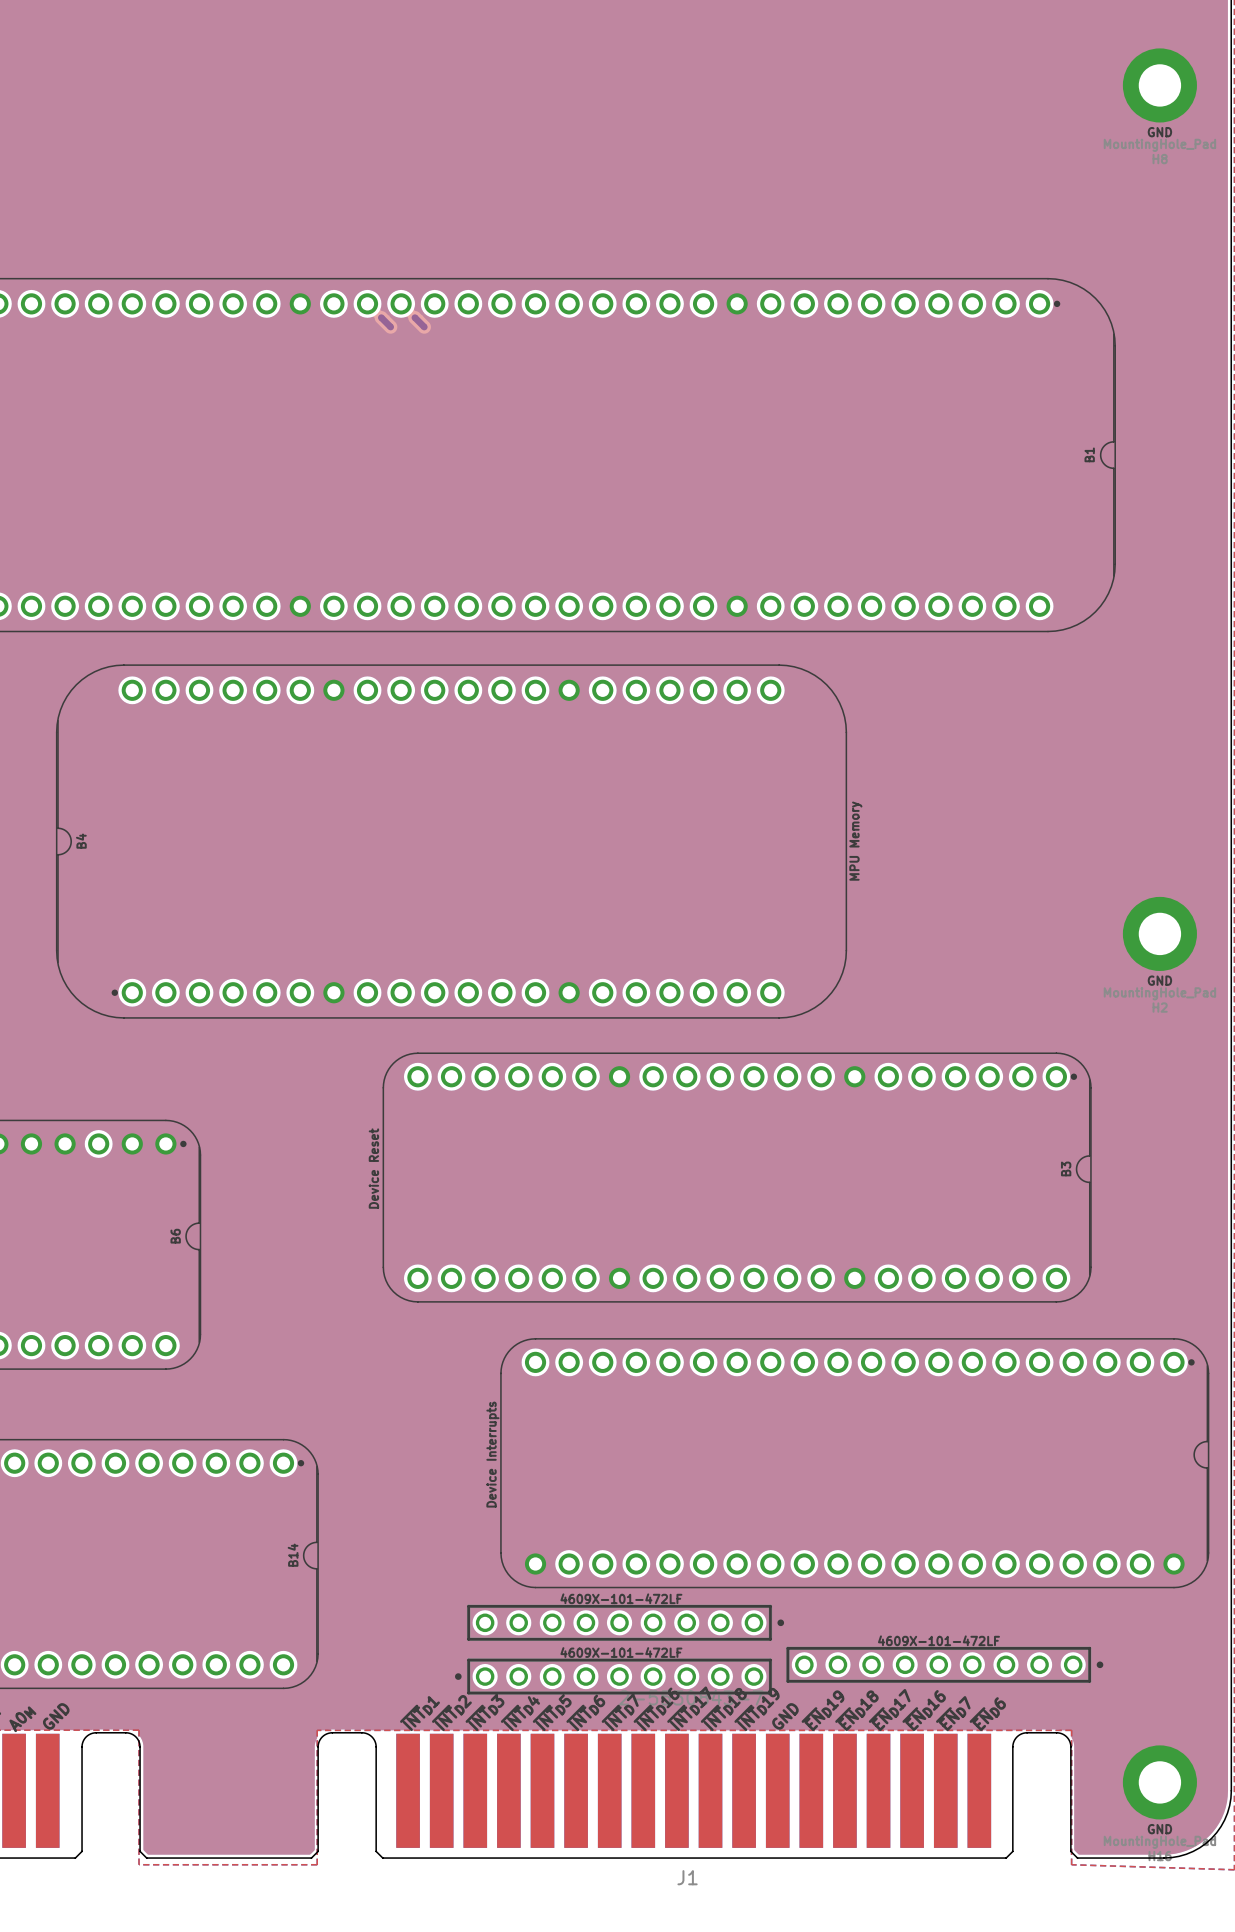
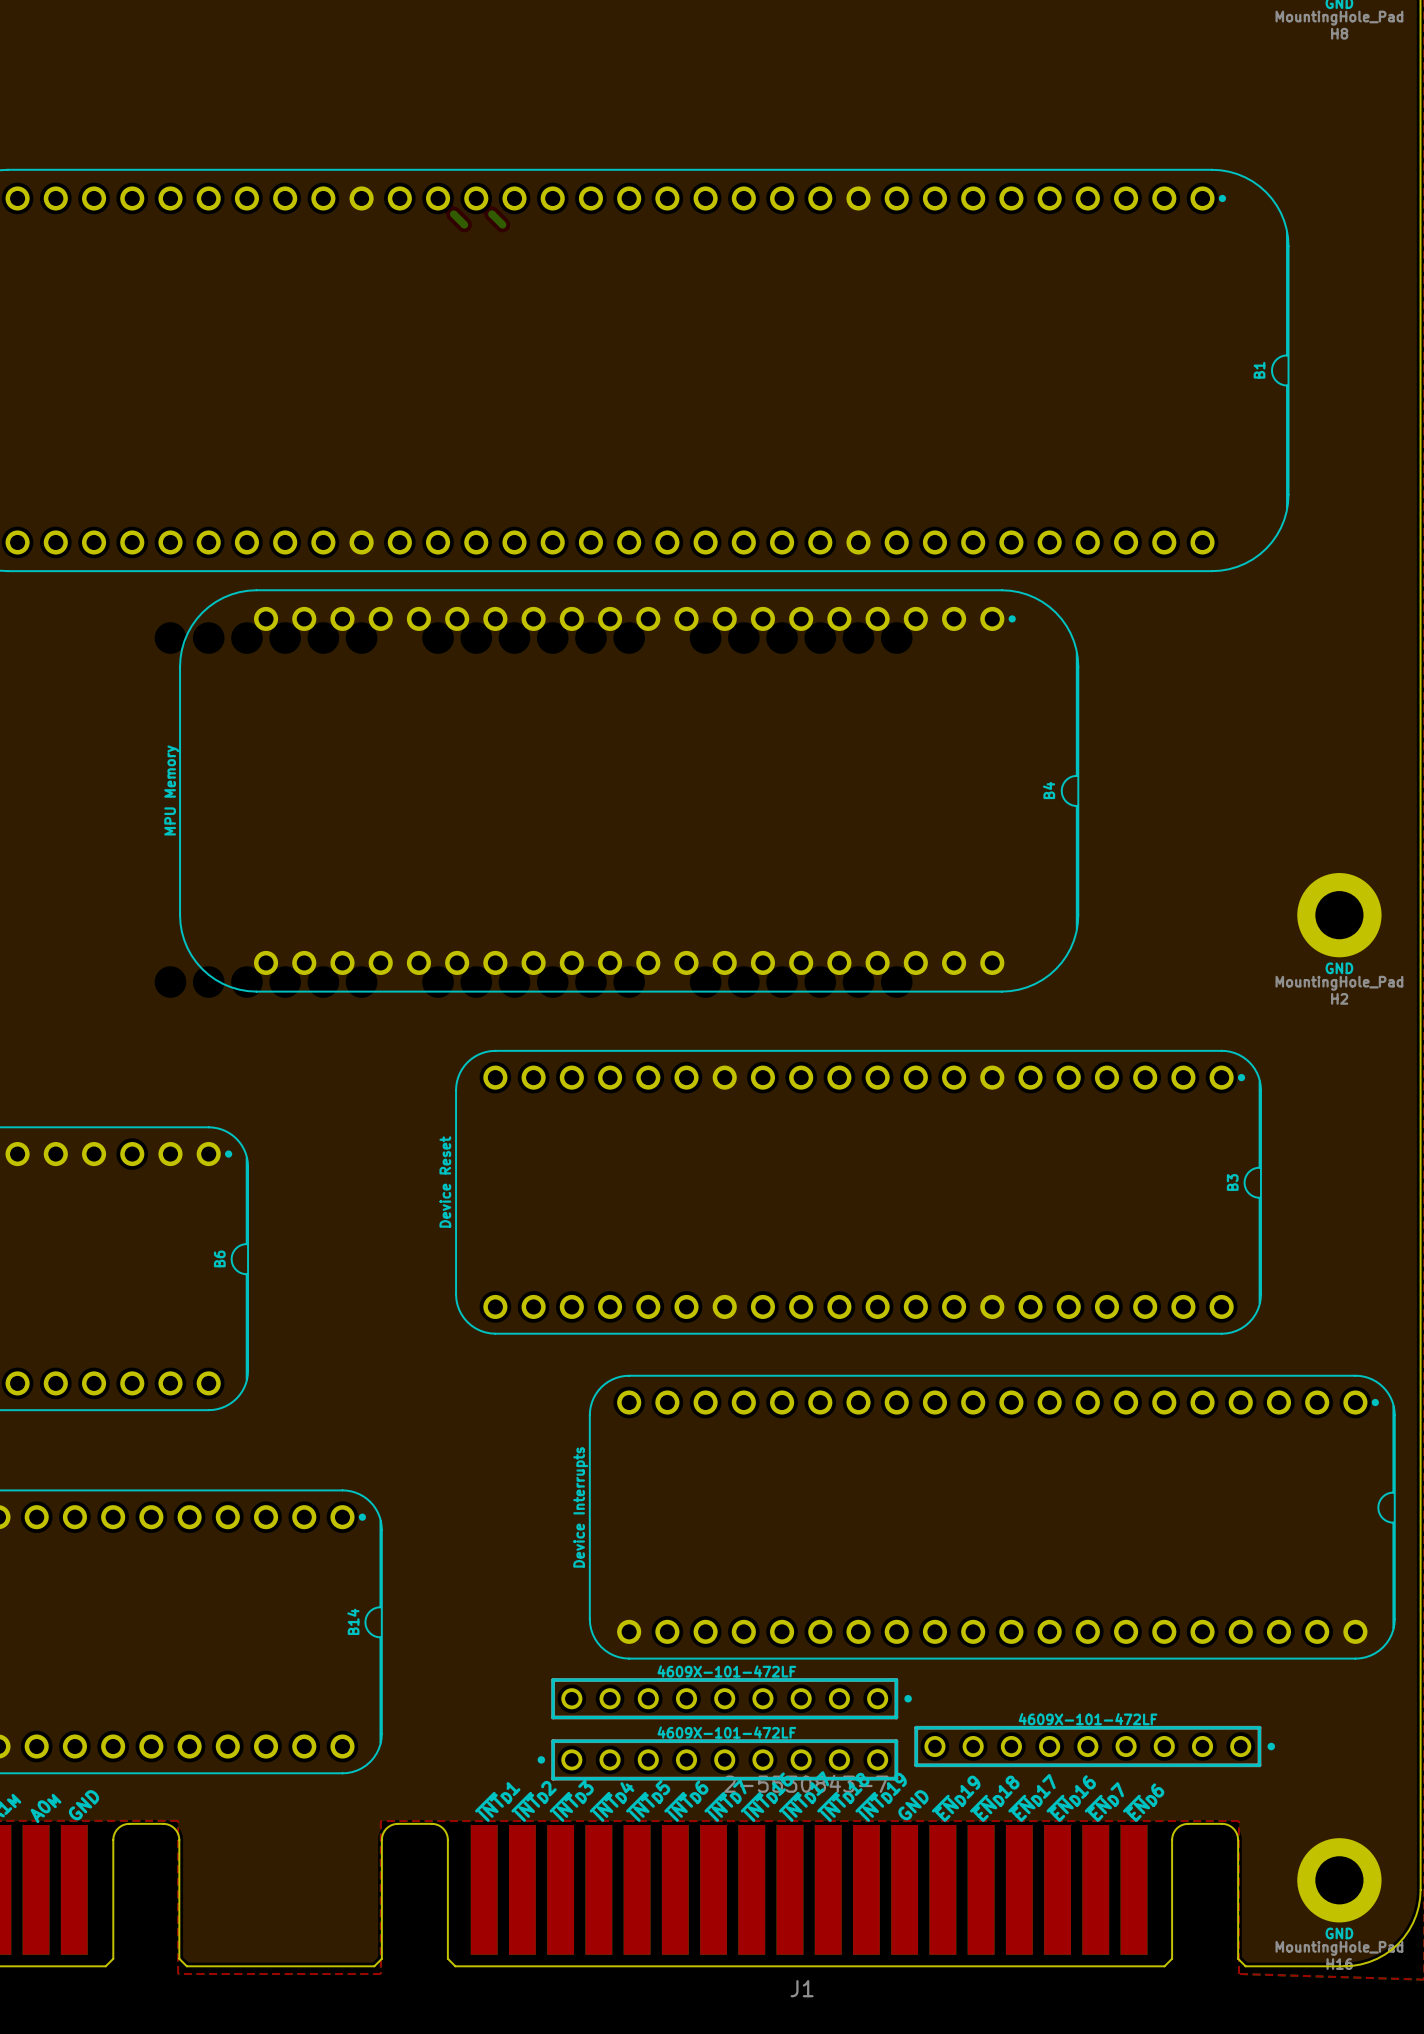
B4 rotation: 0° (451, 841) -> 180° (629, 790)

